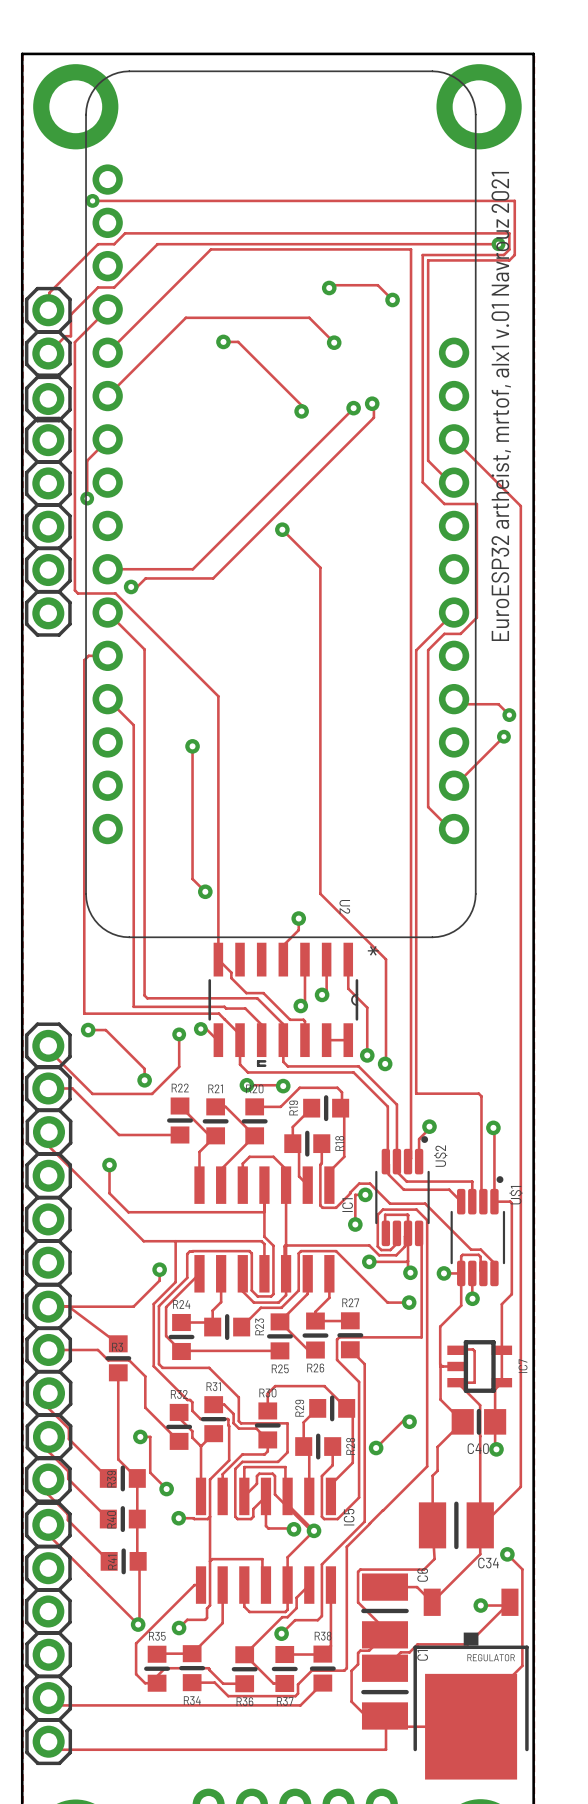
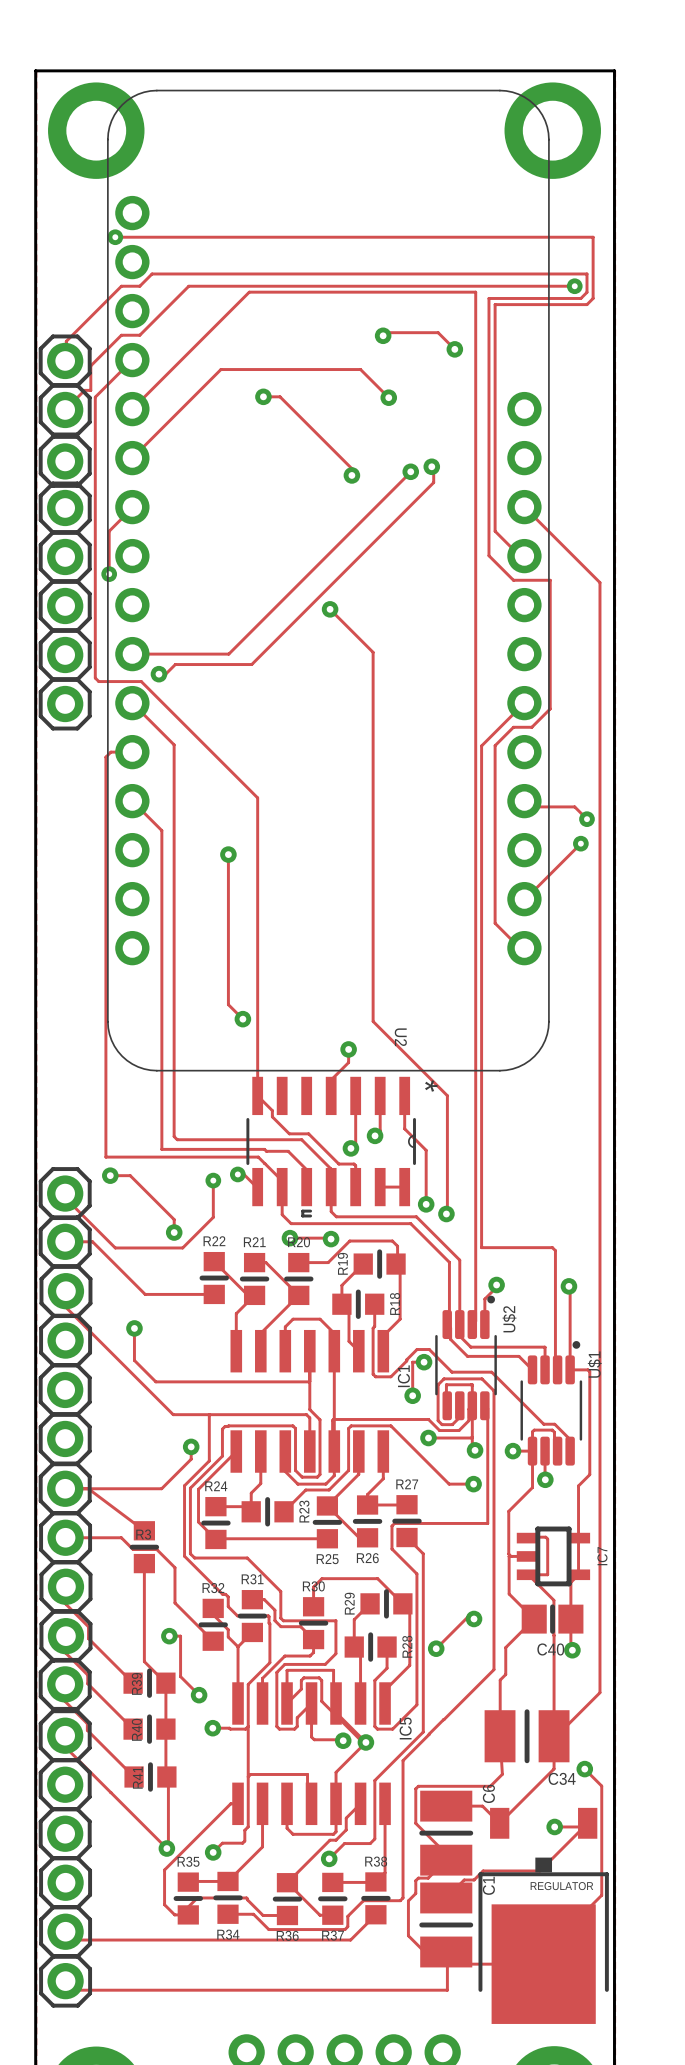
text: EuroESP32 artheist, mrtof, alx1 v.01 Navrouz 2021 (501, 406) -> none

